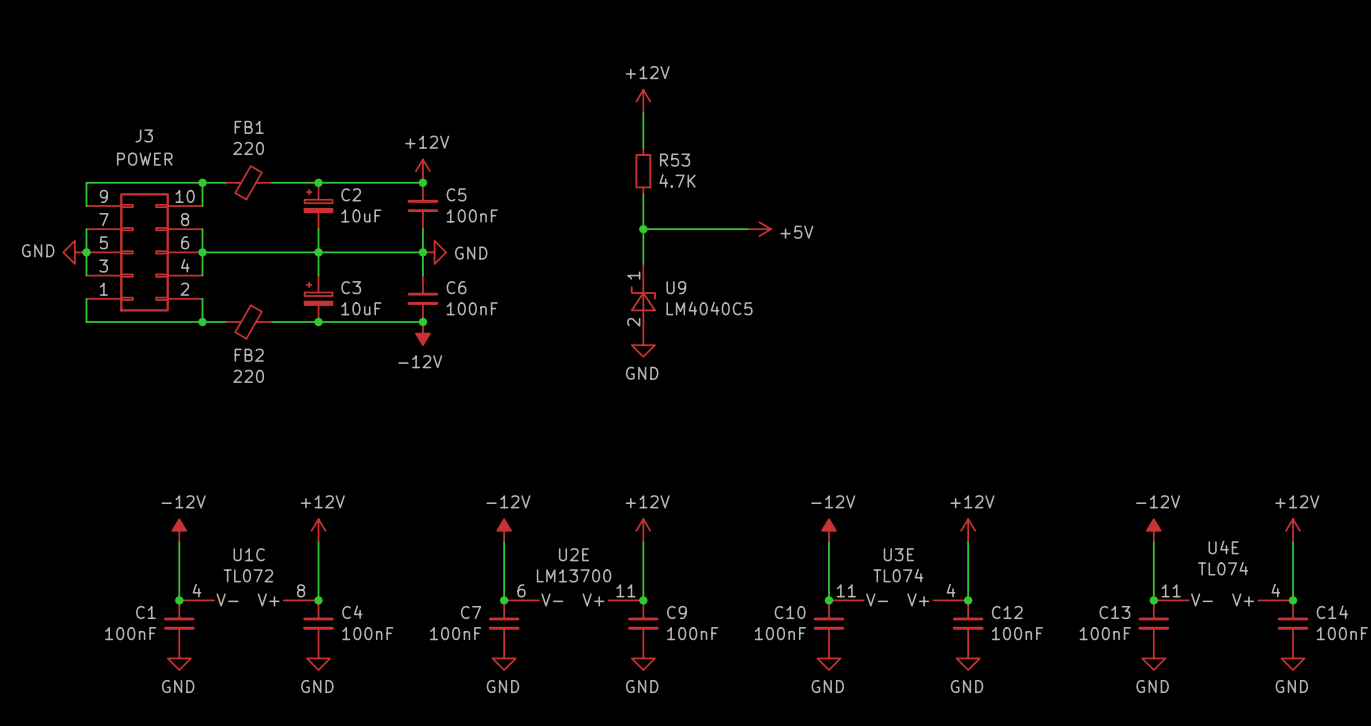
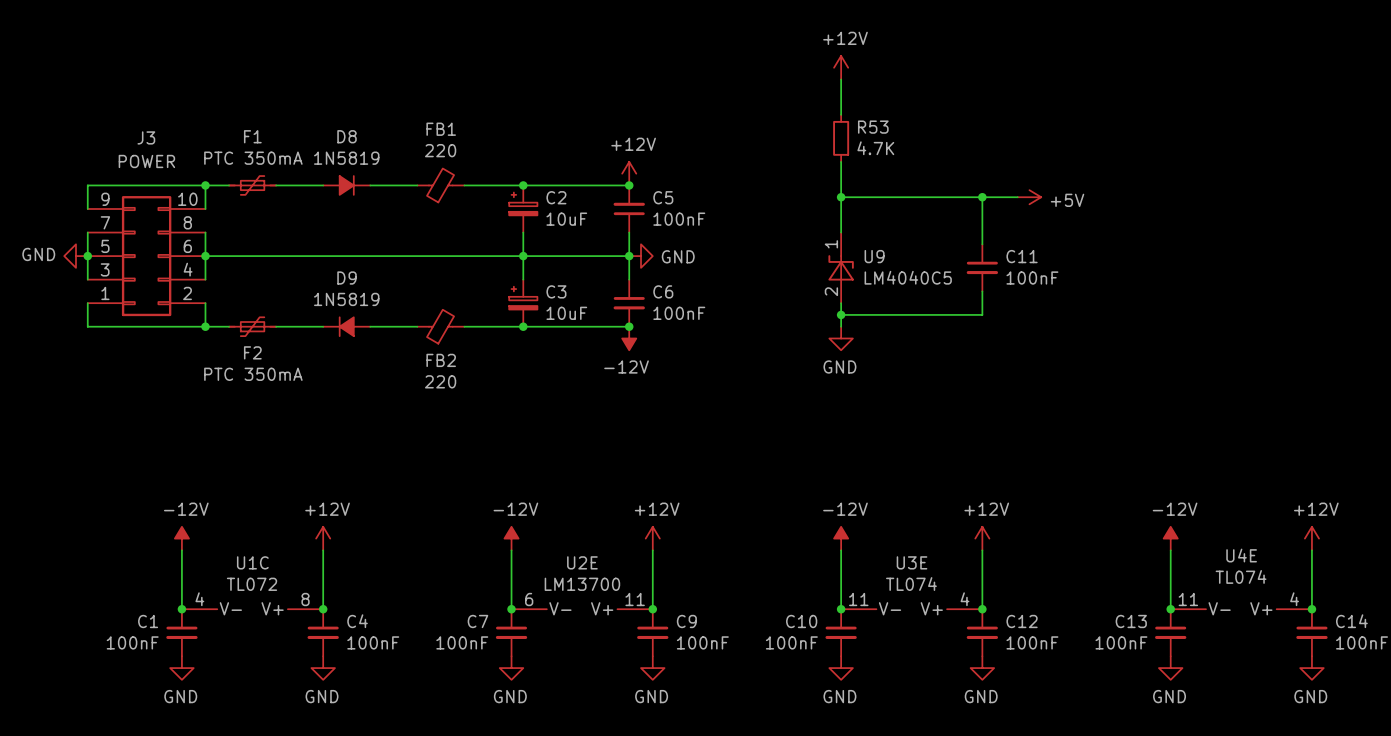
power symbol: none -> +12V (841, 67)
power symbol position: +12V (643, 101) -> +12V (629, 173)
wire: (643, 113) (643, 147) -> (841, 79) (841, 114)
power symbol: +12V (422, 171) -> none
R53 position: (643, 171) -> (841, 138)
FB1 position: (248, 182) -> (440, 185)
F1: none -> PTC 350mA (252, 185)
junction: (318, 182) -> none
D8: none -> 1N5819 (346, 185)
junction: (422, 182) -> none
wire: none -> (464, 185) (629, 185)
junction: none -> (523, 185)
junction: none -> (629, 185)
wire: (643, 194) (643, 263) -> (841, 161) (841, 232)
wire: none -> (841, 197) (1017, 197)
junction: none -> (841, 197)
wire: none -> (982, 197) (982, 244)
junction: none -> (982, 197)
power symbol: none -> +5V (1029, 197)
C2 position: (318, 205) -> (523, 209)
C5 position: (422, 205) -> (629, 209)
wire: (318, 229) (318, 275) -> (523, 232) (523, 279)
wire: (422, 229) (422, 275) -> (629, 232) (629, 279)
wire: (643, 229) (747, 229) -> none
junction: (643, 229) -> none
power symbol: +5V (759, 229) -> none
junction: (318, 252) -> none
wire: none -> (429, 256) (629, 256)
junction: (422, 252) -> none
power symbol: GND (434, 252) -> none
junction: none -> (523, 256)
junction: none -> (629, 256)
power symbol: none -> GND (641, 256)
C11: none -> 100nF (982, 267)
wire: none -> (982, 291) (982, 314) (841, 314)
C3 position: (318, 298) -> (523, 303)
C6 position: (422, 298) -> (629, 303)
U9 position: (643, 298) -> (841, 267)
wire: none -> (841, 303) (841, 326)
junction: none -> (841, 314)
FB2 position: (248, 321) -> (440, 326)
F2: none -> PTC 350mA (252, 326)
junction: (318, 321) -> none
D9: none -> 1N5819 (346, 326)
junction: (422, 321) -> none
wire: none -> (464, 326) (629, 326)
junction: none -> (523, 326)
junction: none -> (629, 326)
power symbol position: -12V (422, 333) -> -12V (629, 338)
power symbol: none -> GND (841, 338)
power symbol: GND (643, 345) -> none

